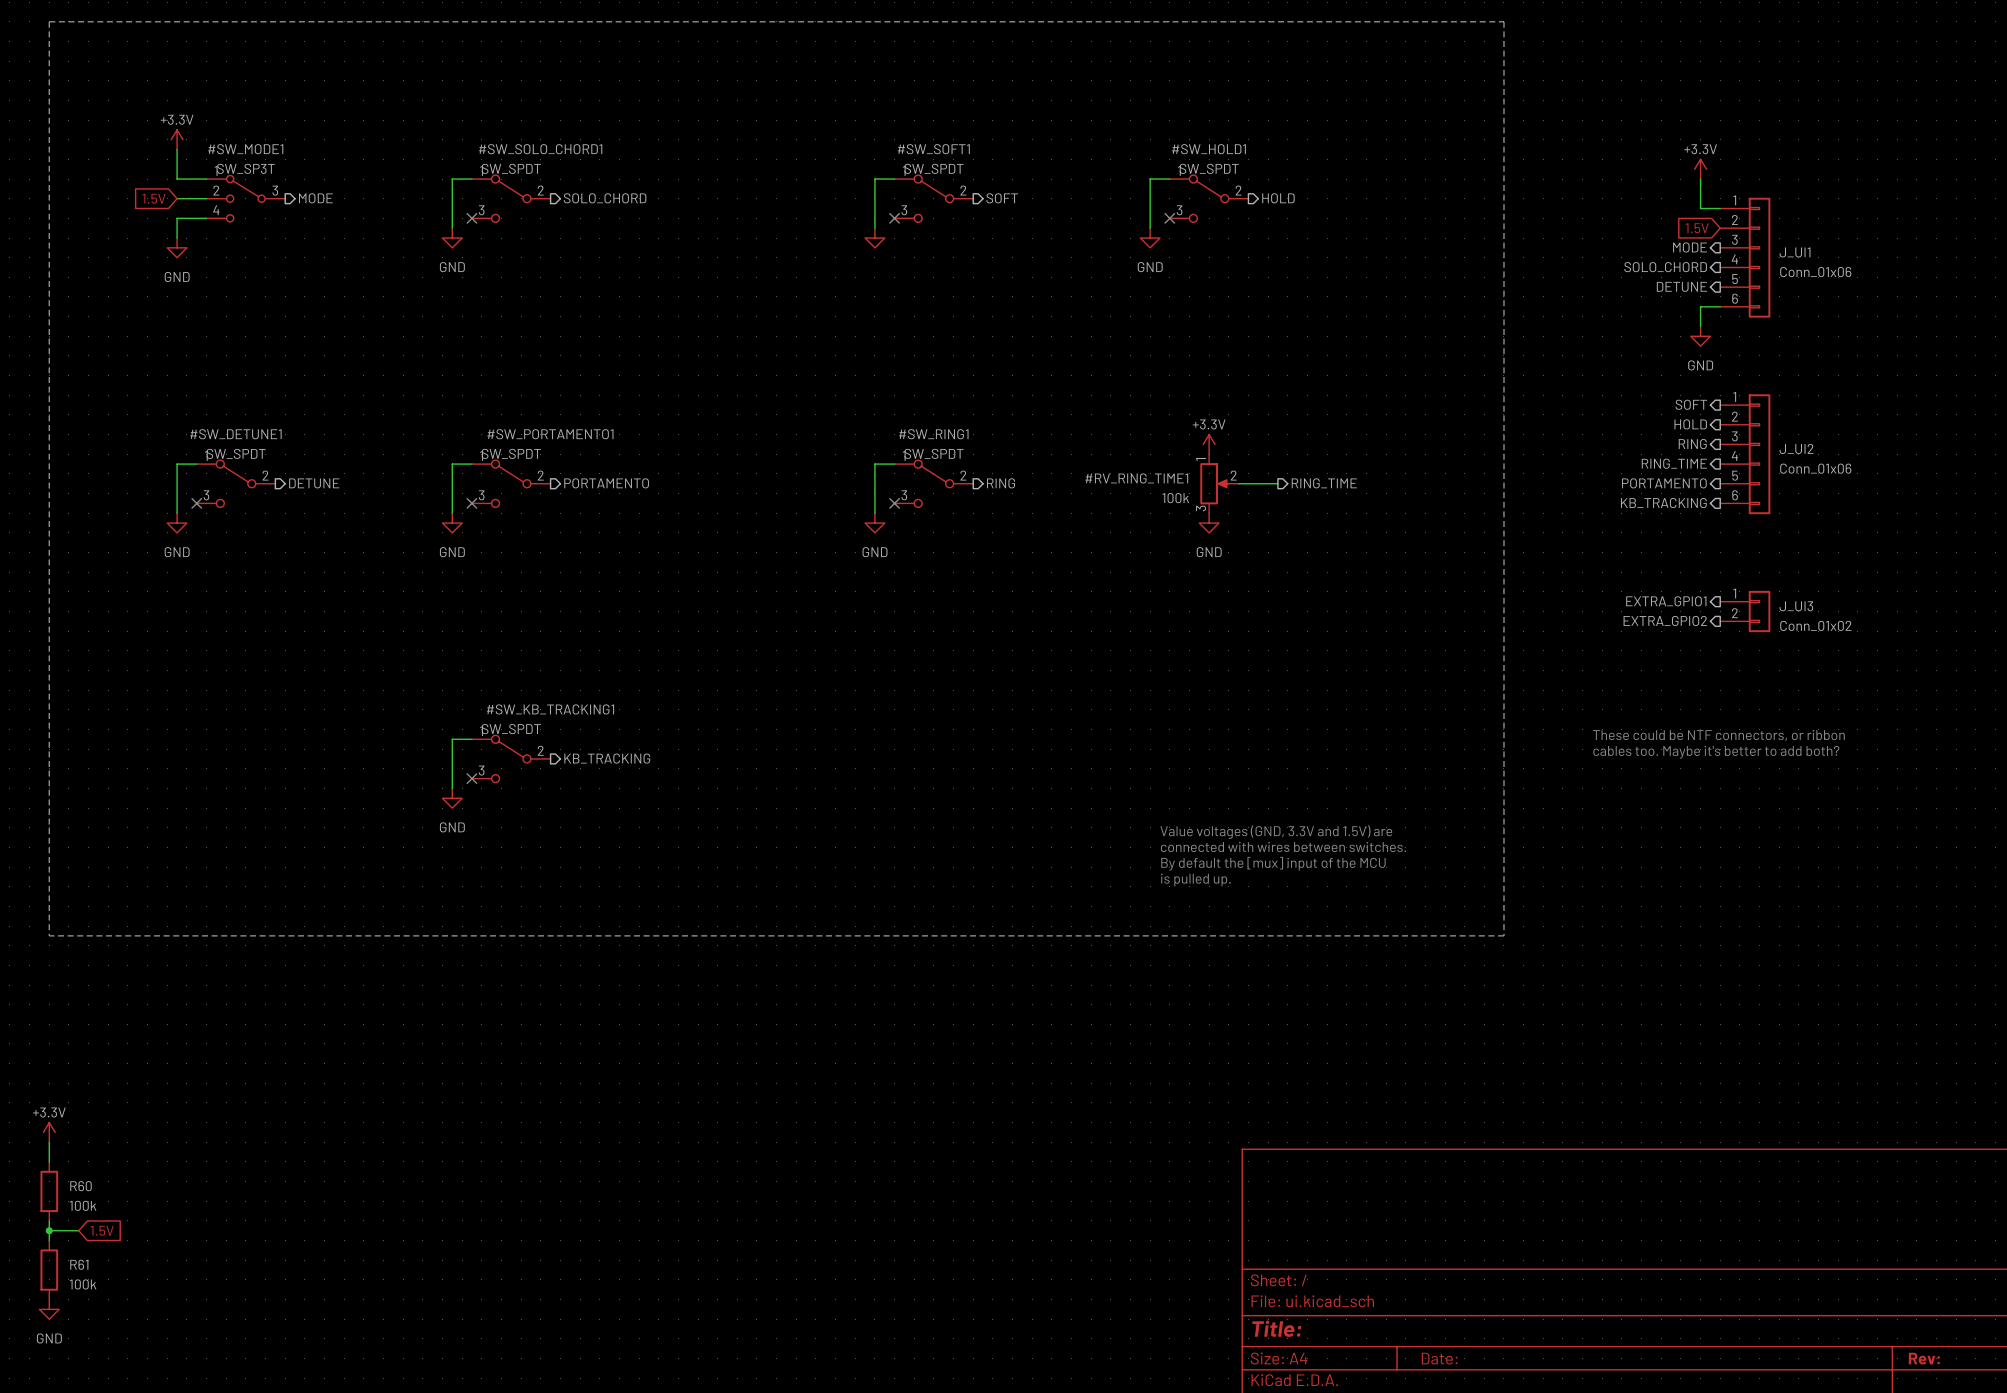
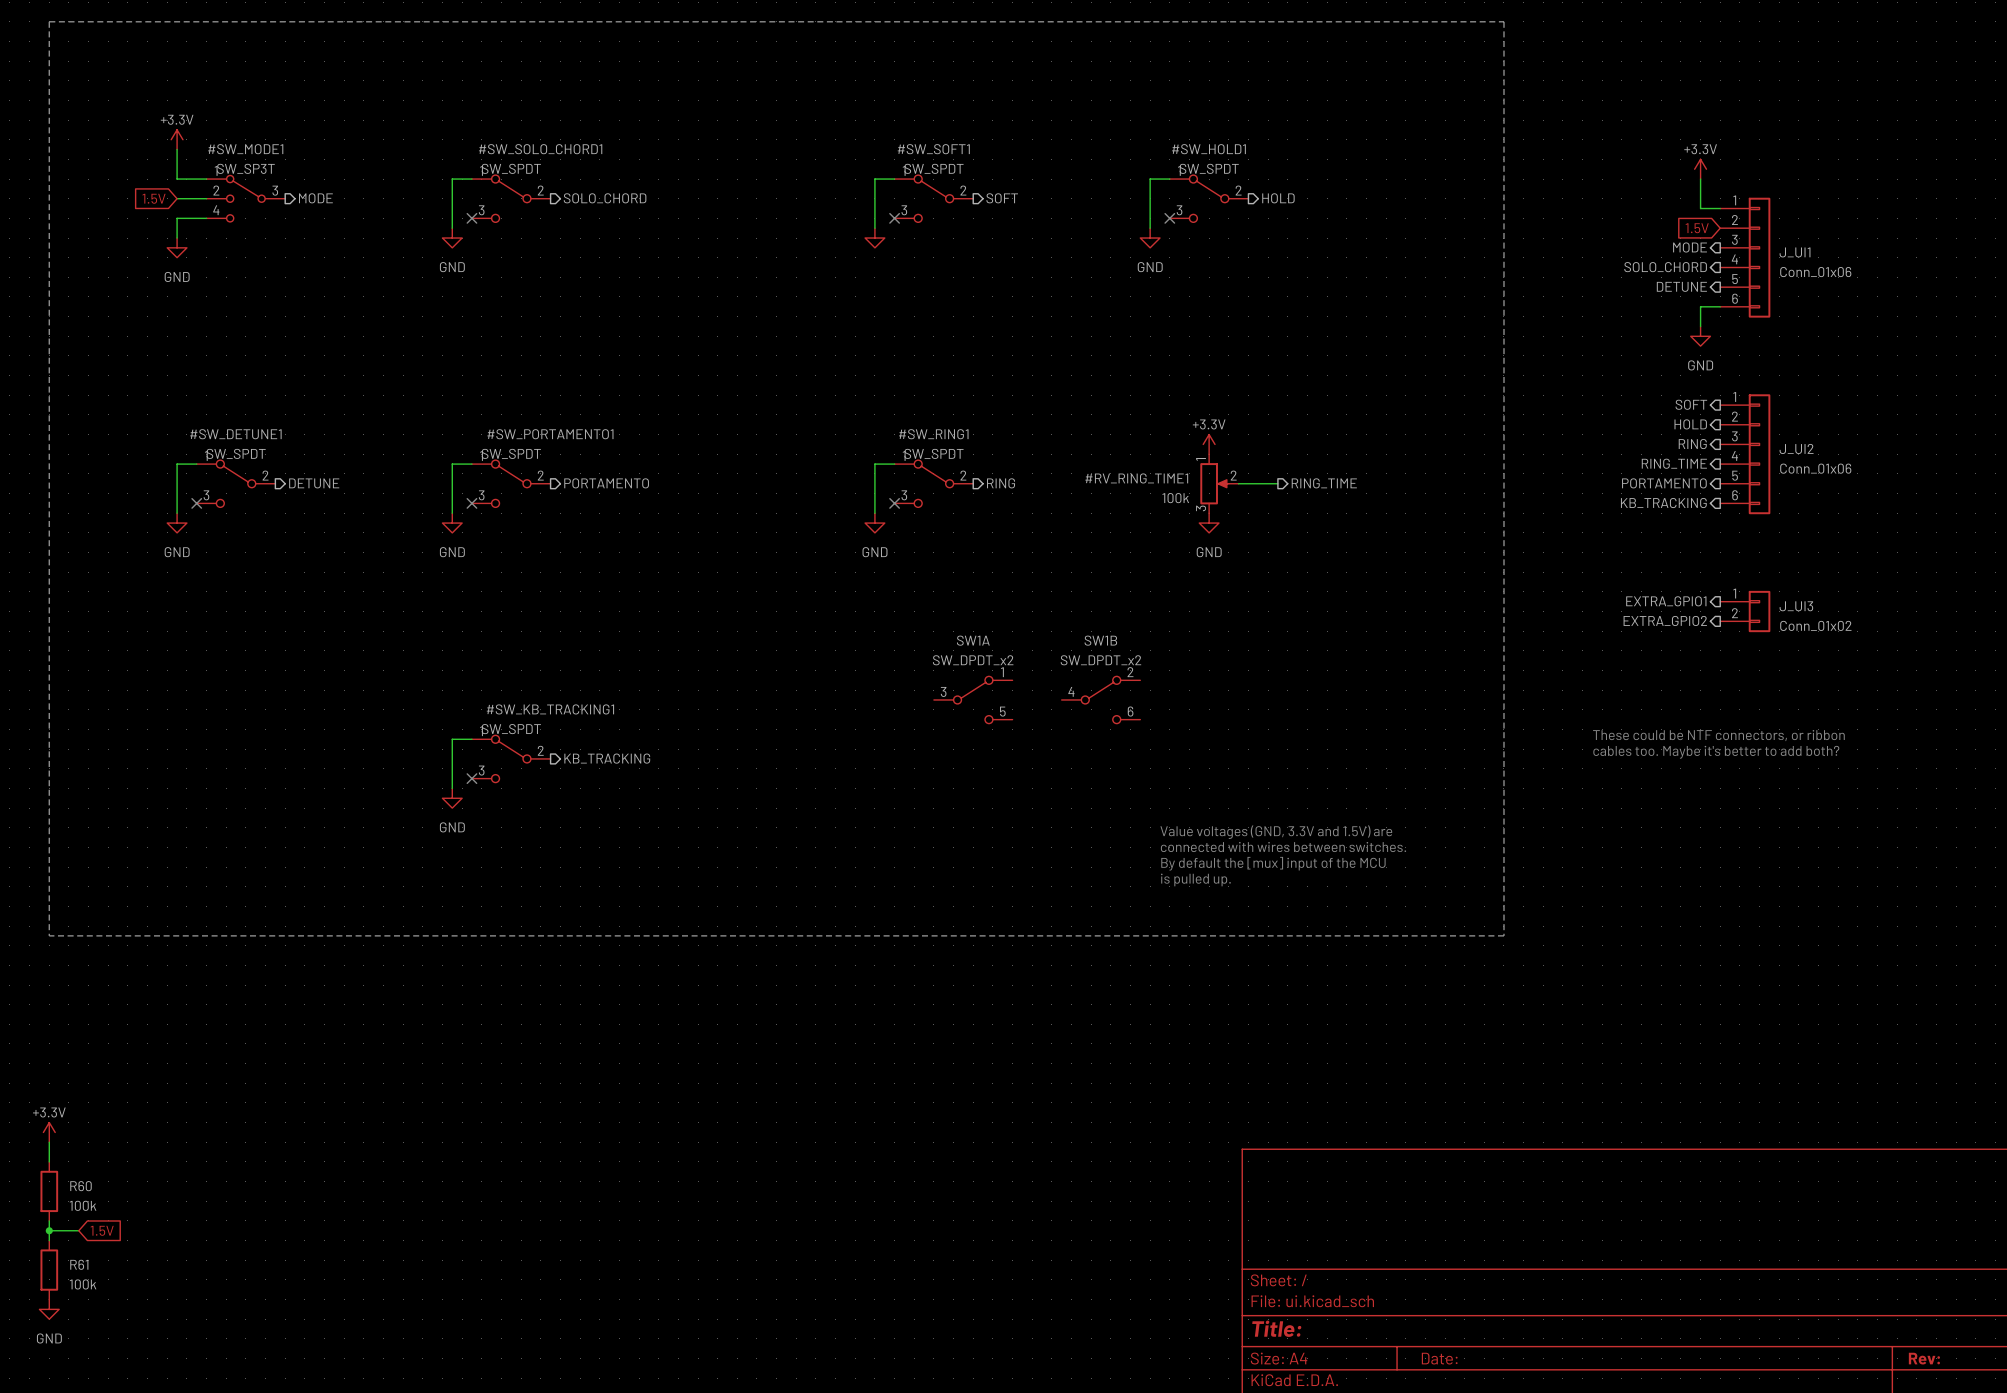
SW1A: none -> SW_DPDT_x2 (973, 699)
SW1B: none -> SW_DPDT_x2 (1101, 699)

